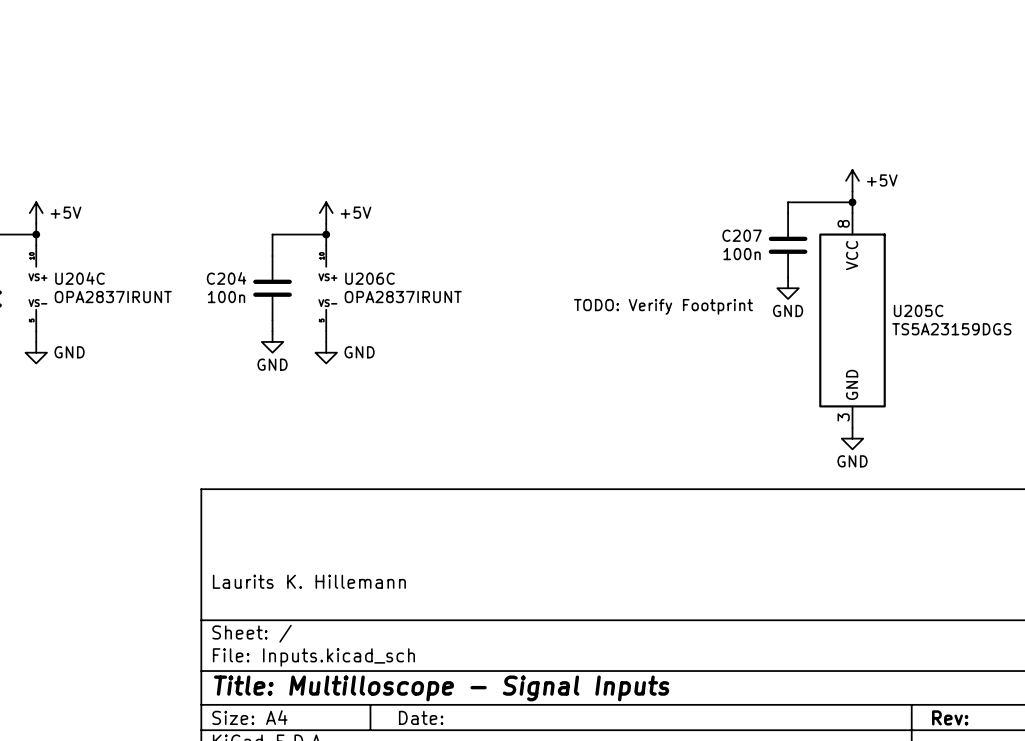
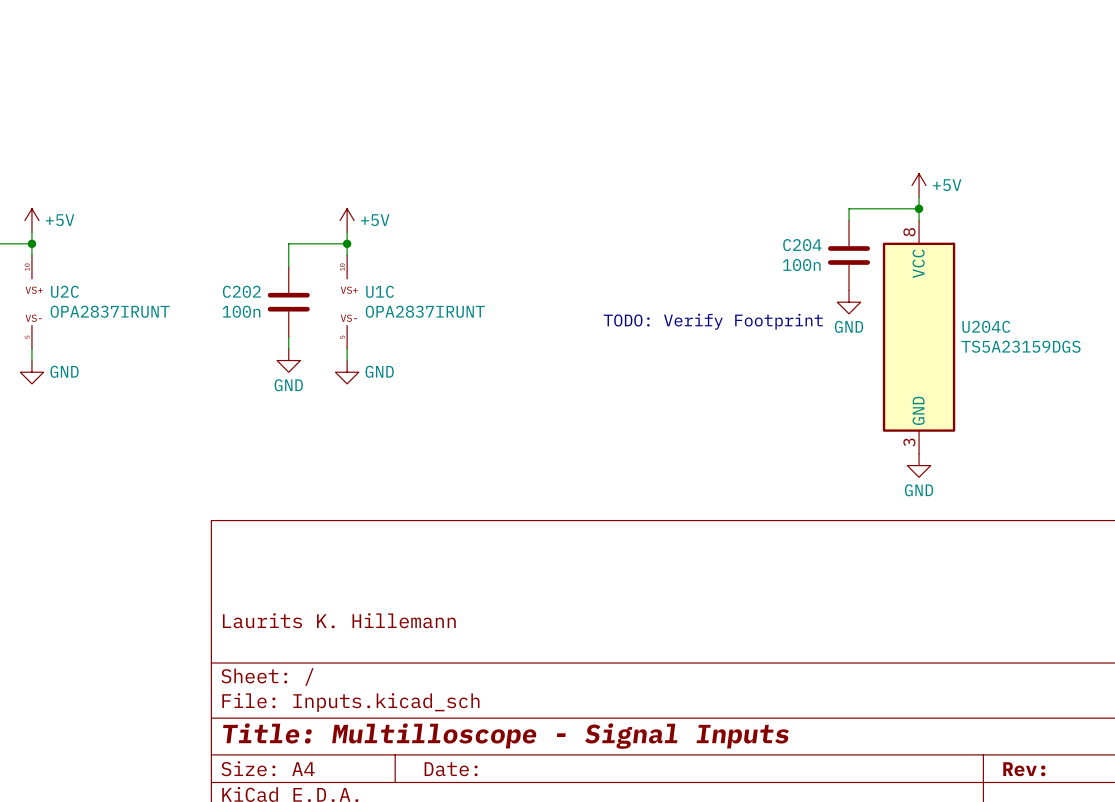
C207 name: C207 (742, 235) -> C204 (802, 245)
U204C name: U204C (80, 278) -> U2C (64, 291)
C204 name: C204 (226, 278) -> C202 (241, 291)
U206C name: U206C (370, 278) -> U1C (380, 291)
U205C name: U205C (918, 310) -> U204C (986, 326)

